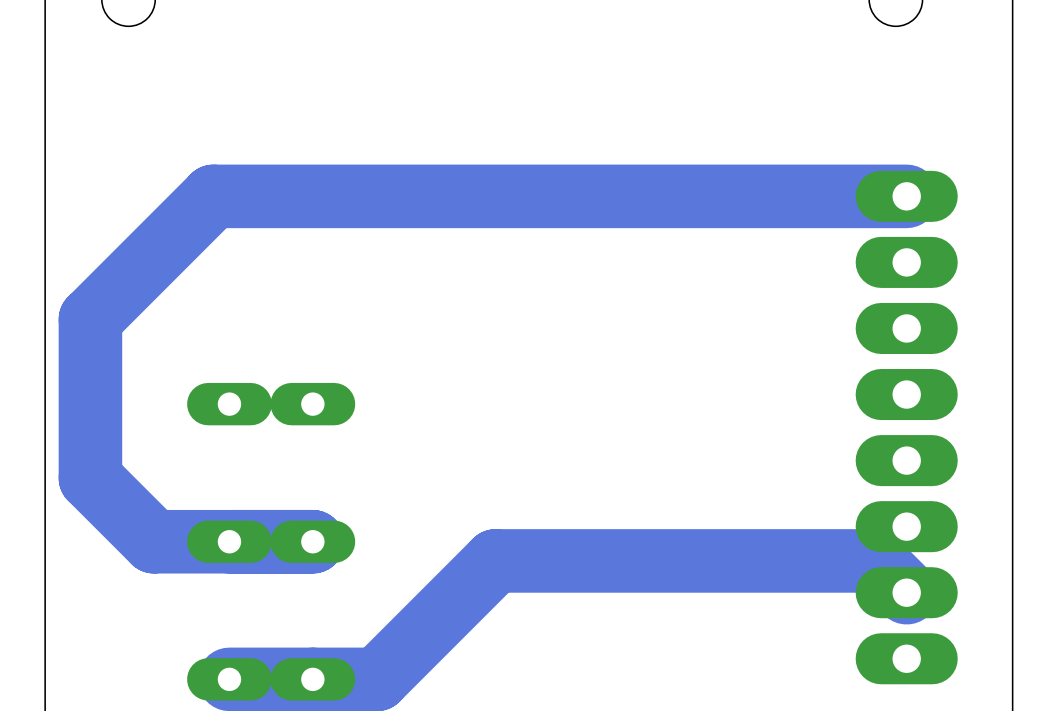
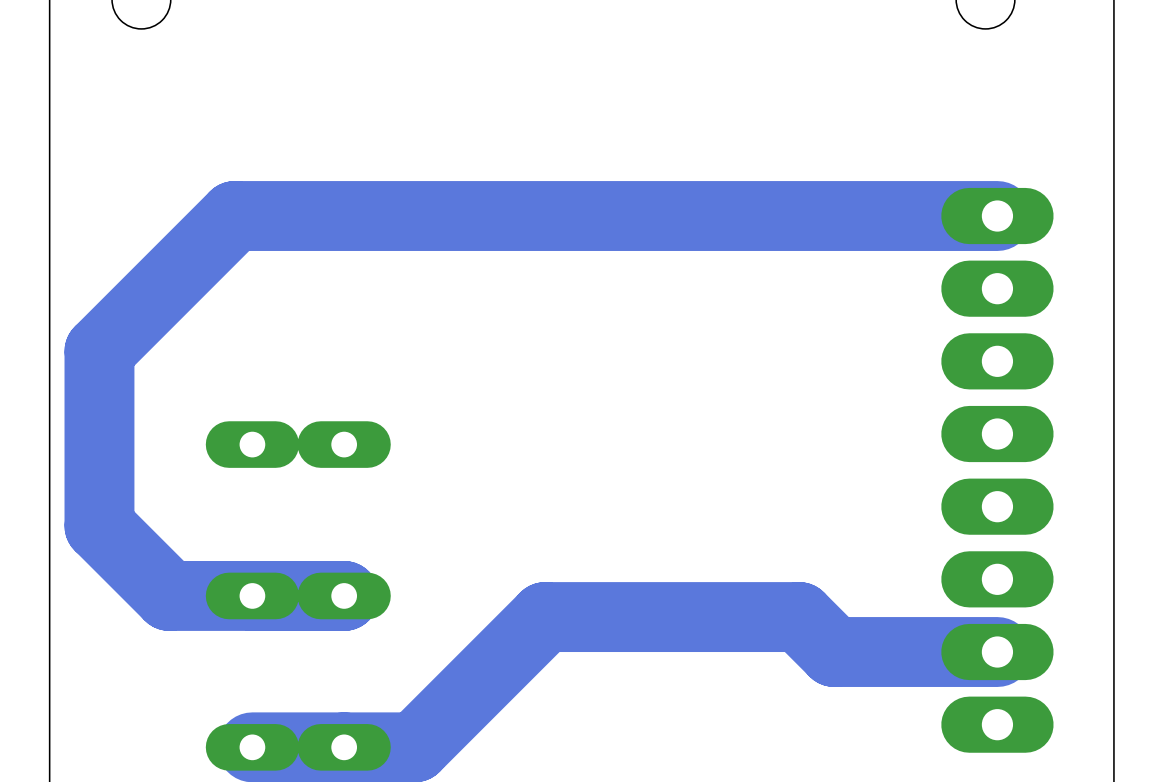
track: (726, 560) (874, 560) (906, 592) -> (799, 617) (834, 652) (997, 652)

